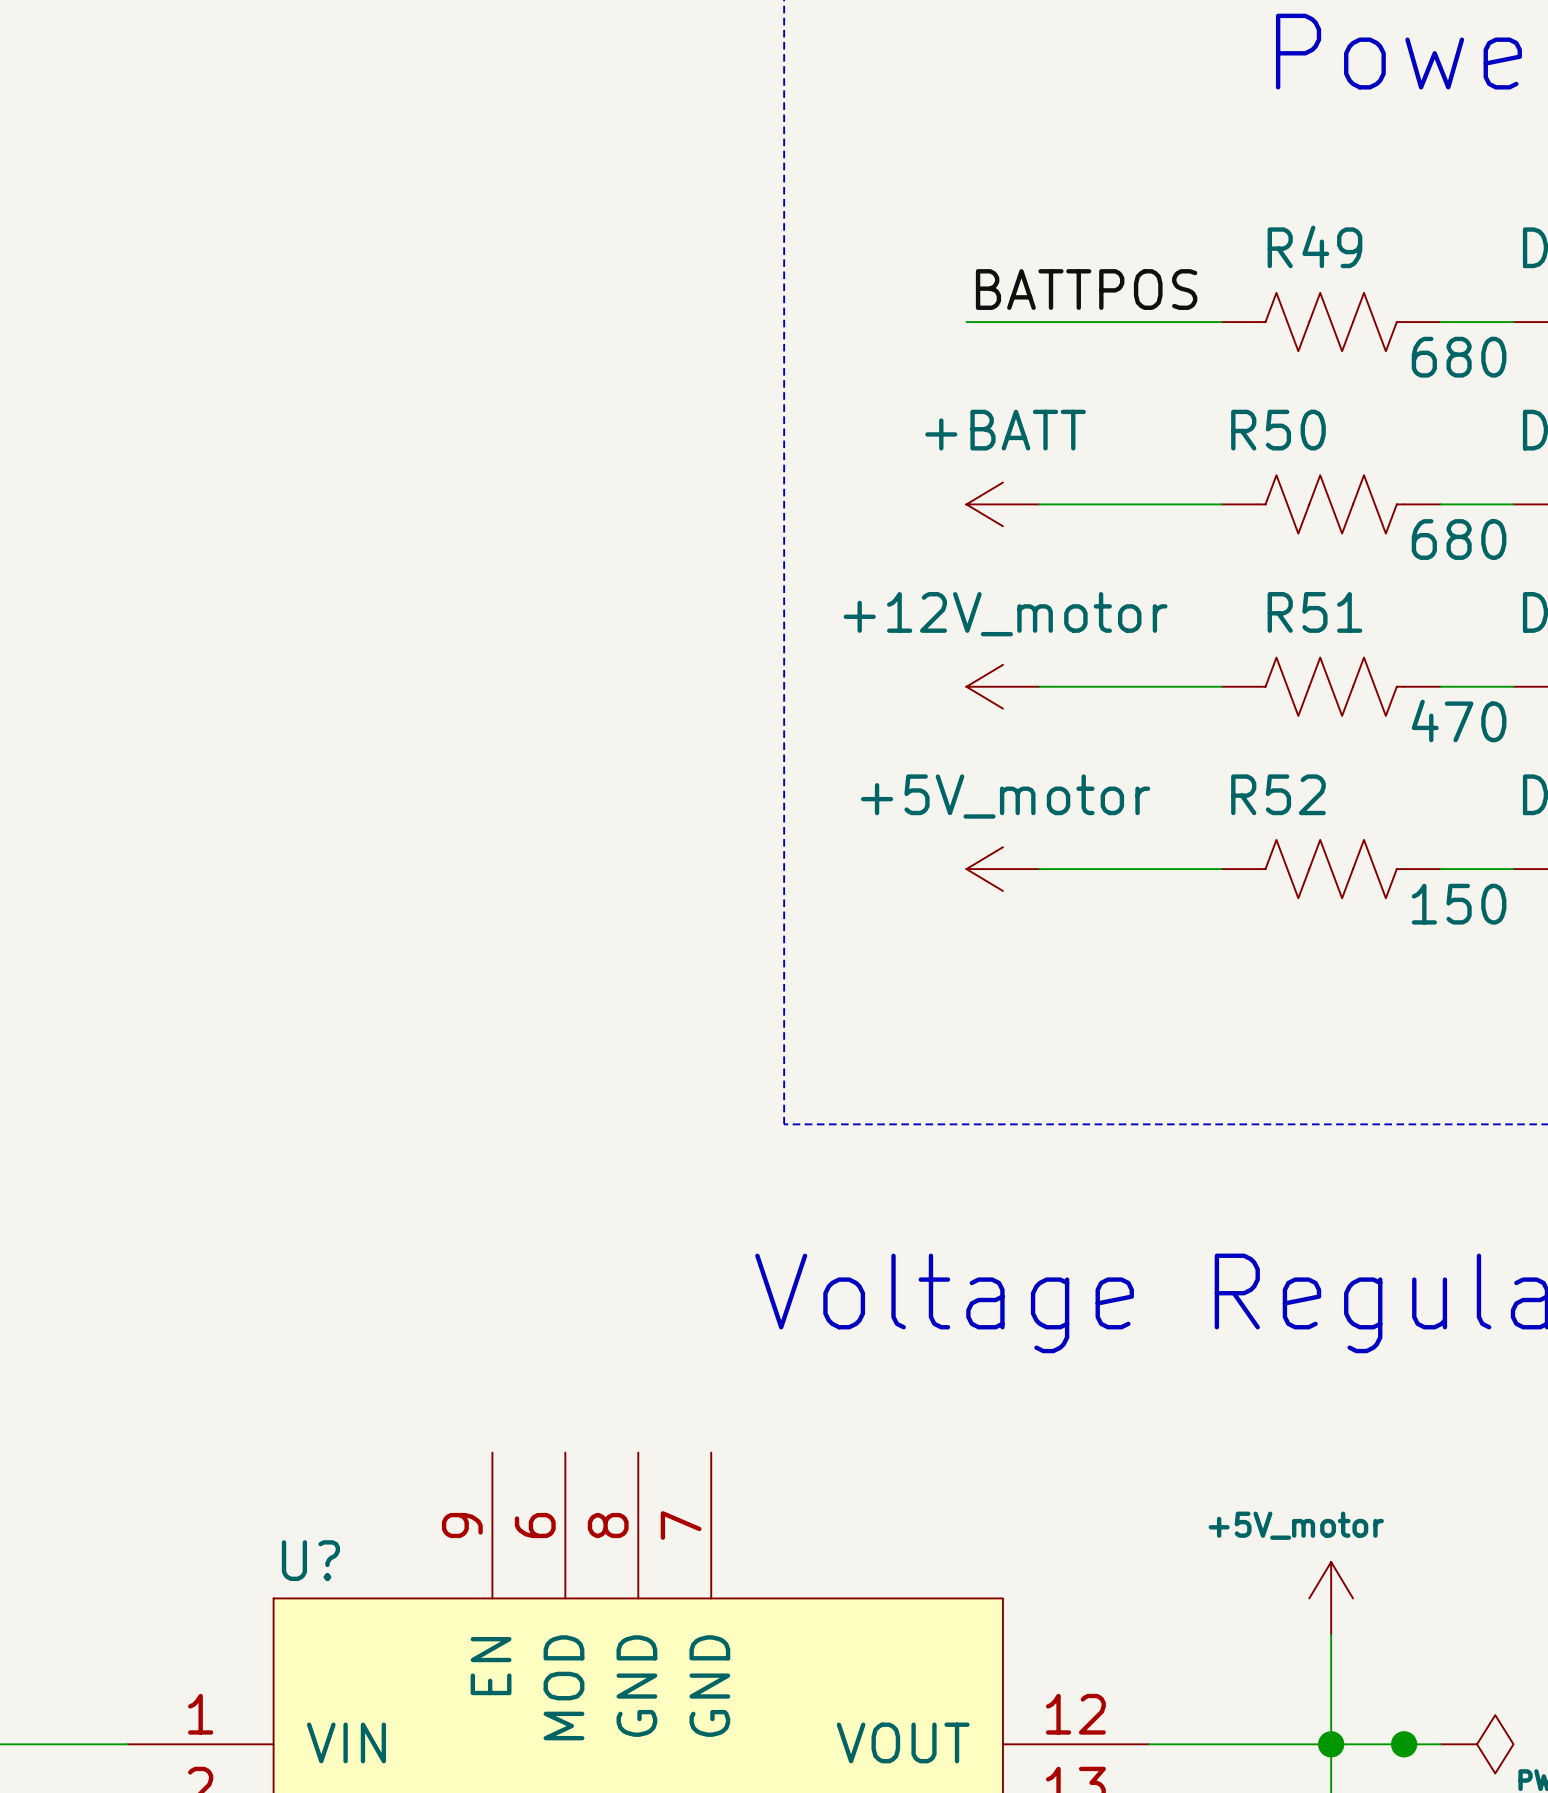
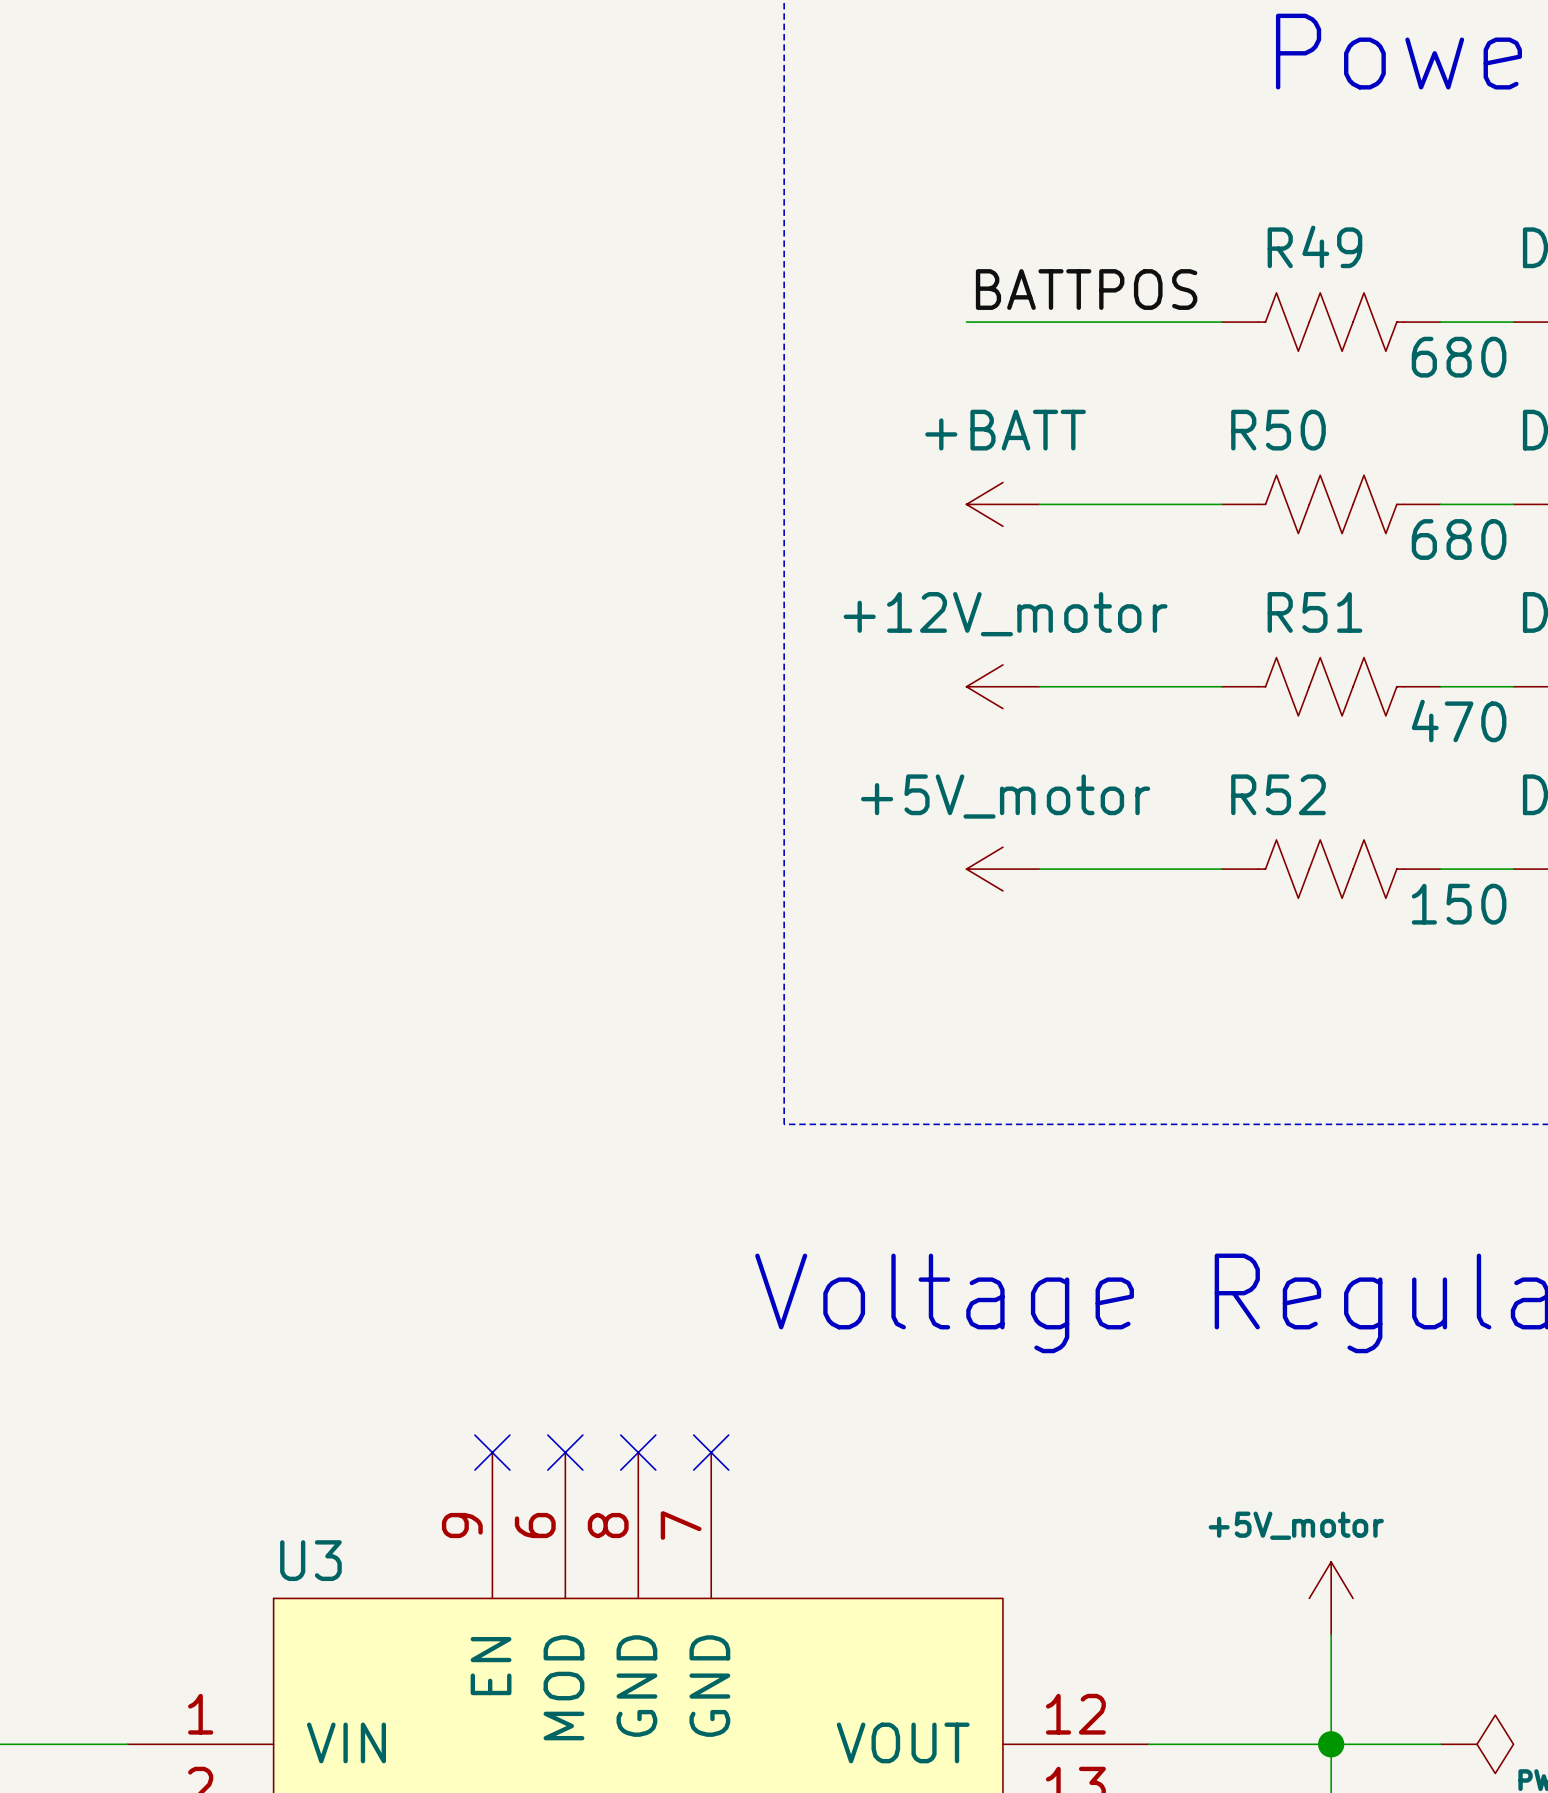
no-connect mark: none -> (492, 1452)
no-connect mark: none -> (565, 1452)
no-connect mark: none -> (638, 1452)
no-connect mark: none -> (711, 1452)
U? name: U? (310, 1560) -> U3 (310, 1560)
junction: (1404, 1744) -> none

